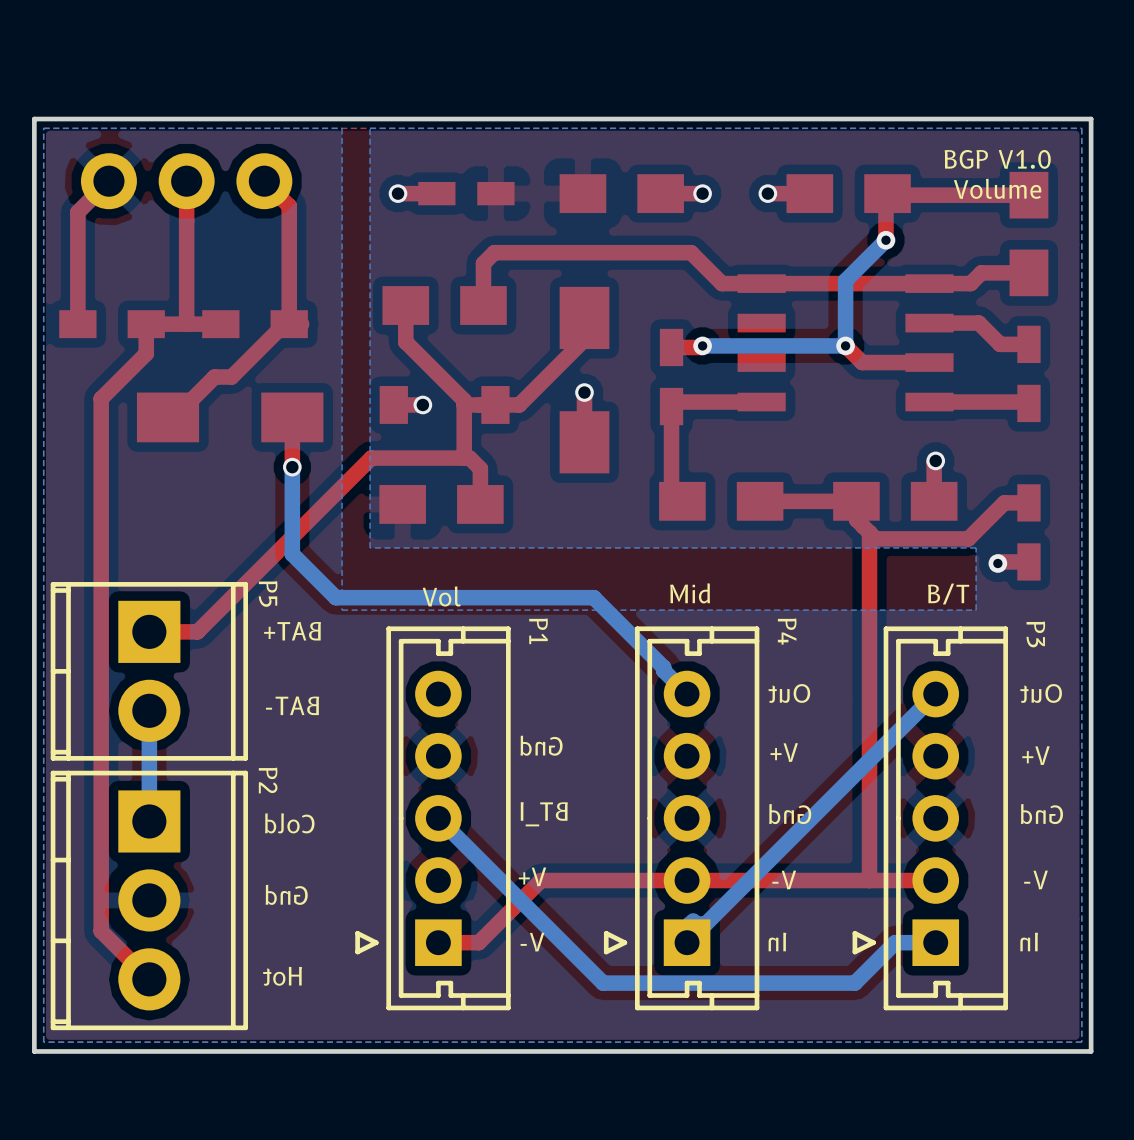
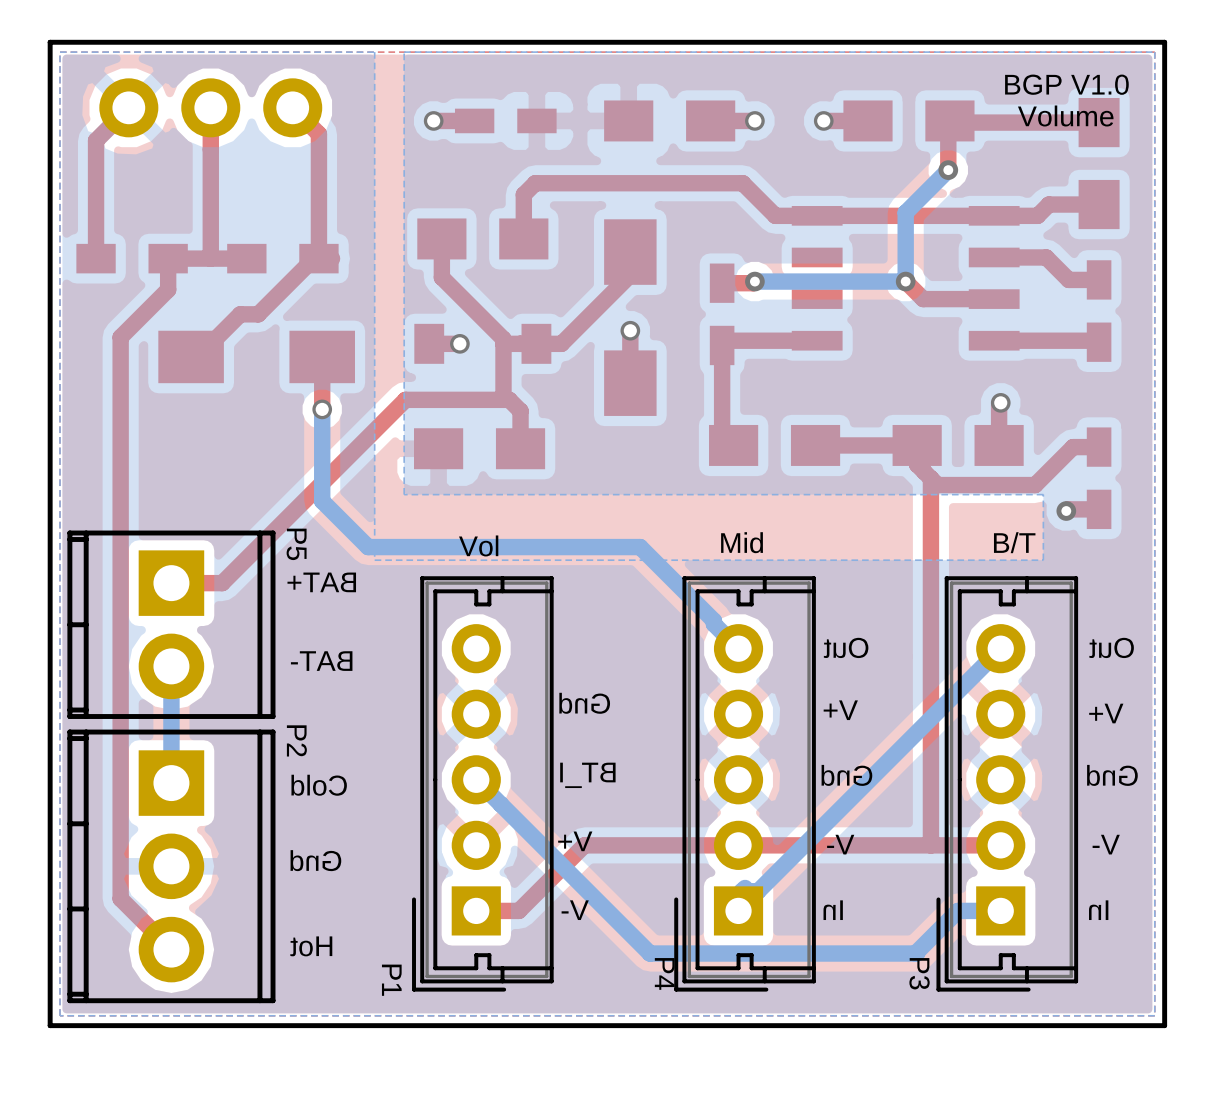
P1 footprint: [355, 626, 511, 1011] -> [412, 576, 554, 992]
P4 footprint: [603, 626, 760, 1011] -> [674, 576, 816, 992]
P3 footprint: [852, 626, 1008, 1011] -> [936, 576, 1079, 992]
P1 name position: P1 (538, 631) -> P1 (391, 980)
P4 name position: P4 (787, 631) -> P4 (664, 973)
P3 name position: P3 (1035, 634) -> P3 (919, 973)

